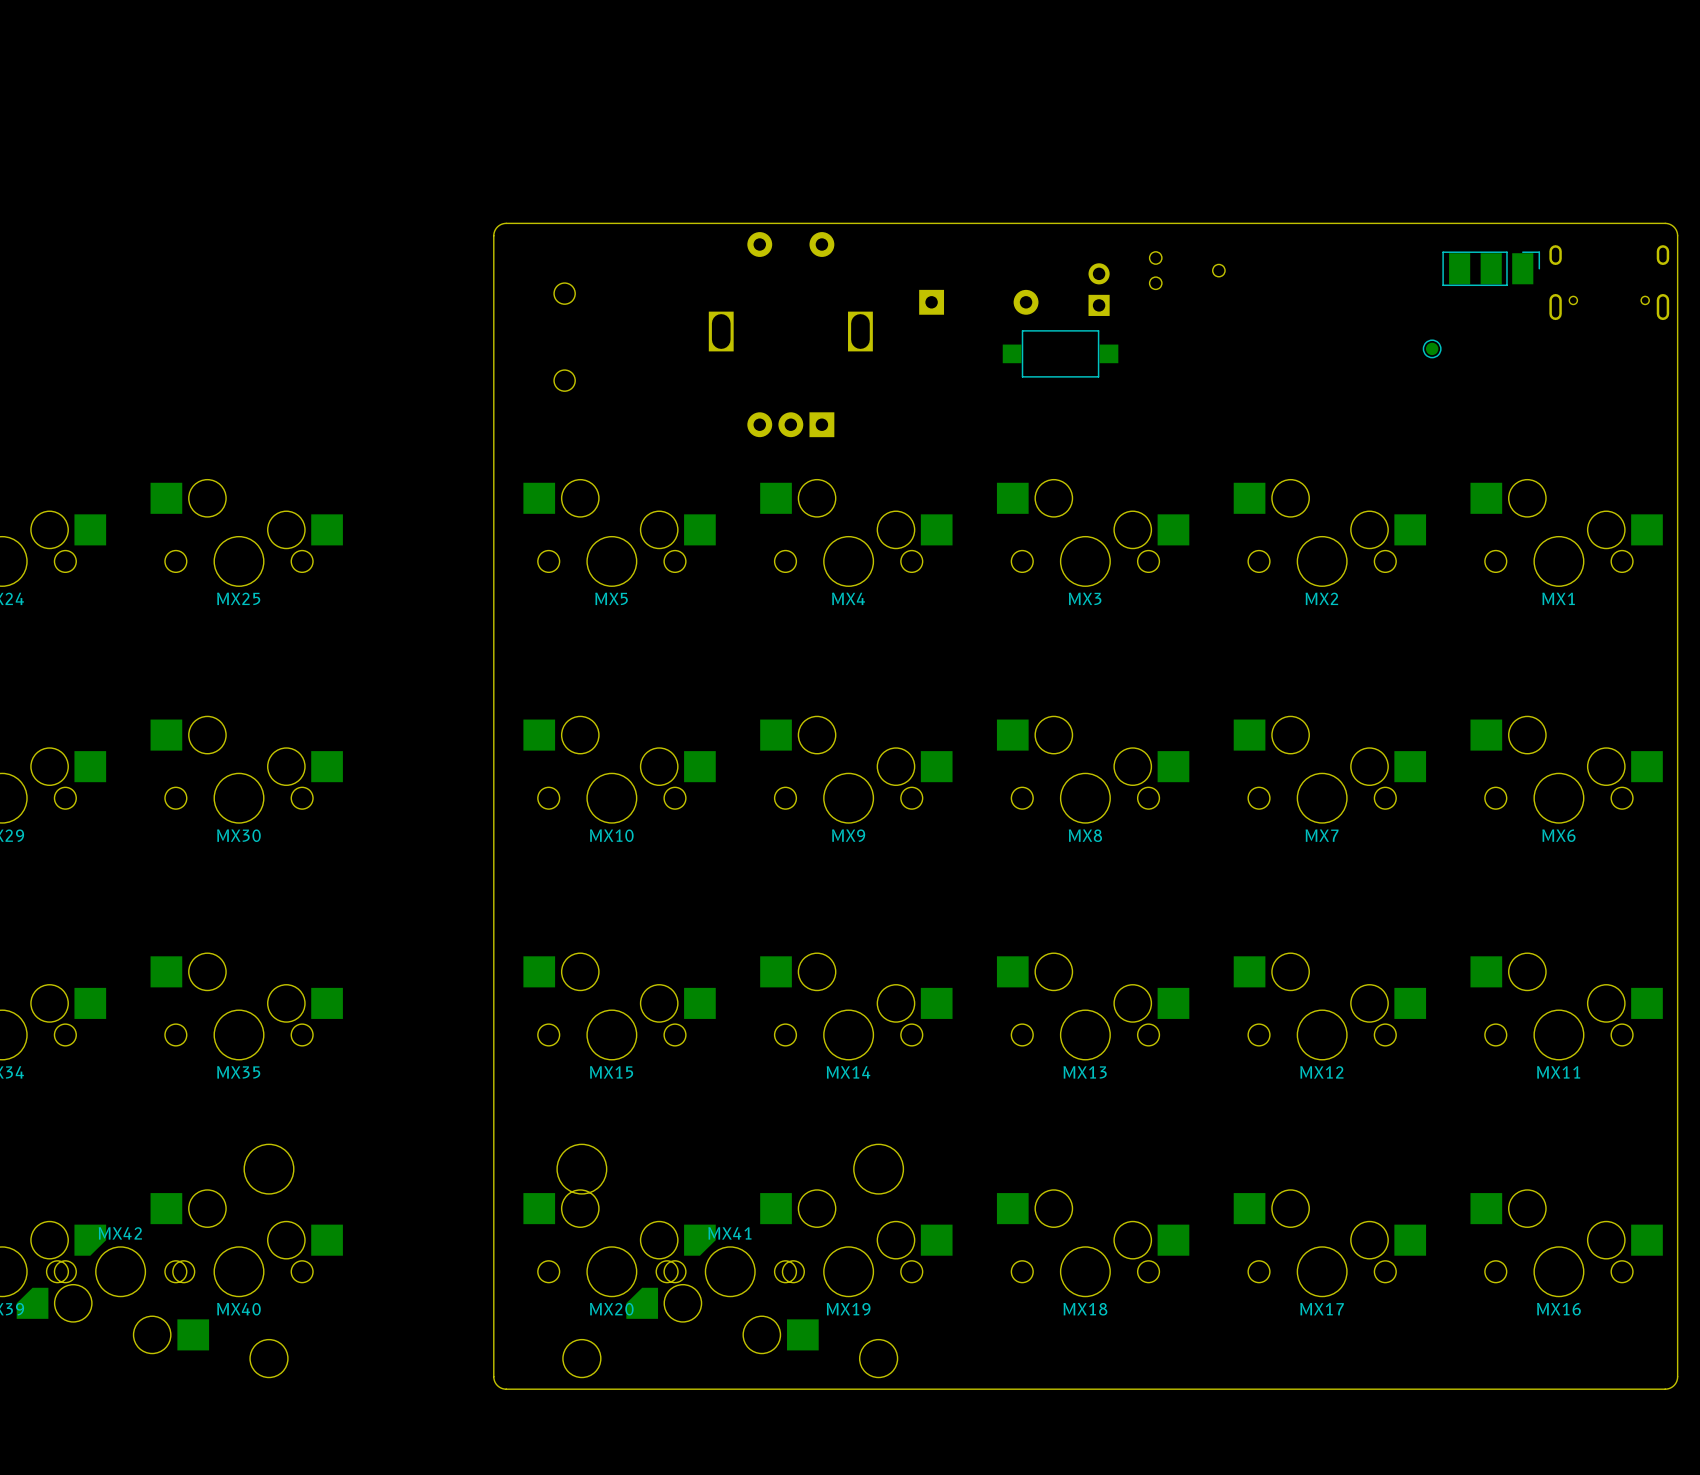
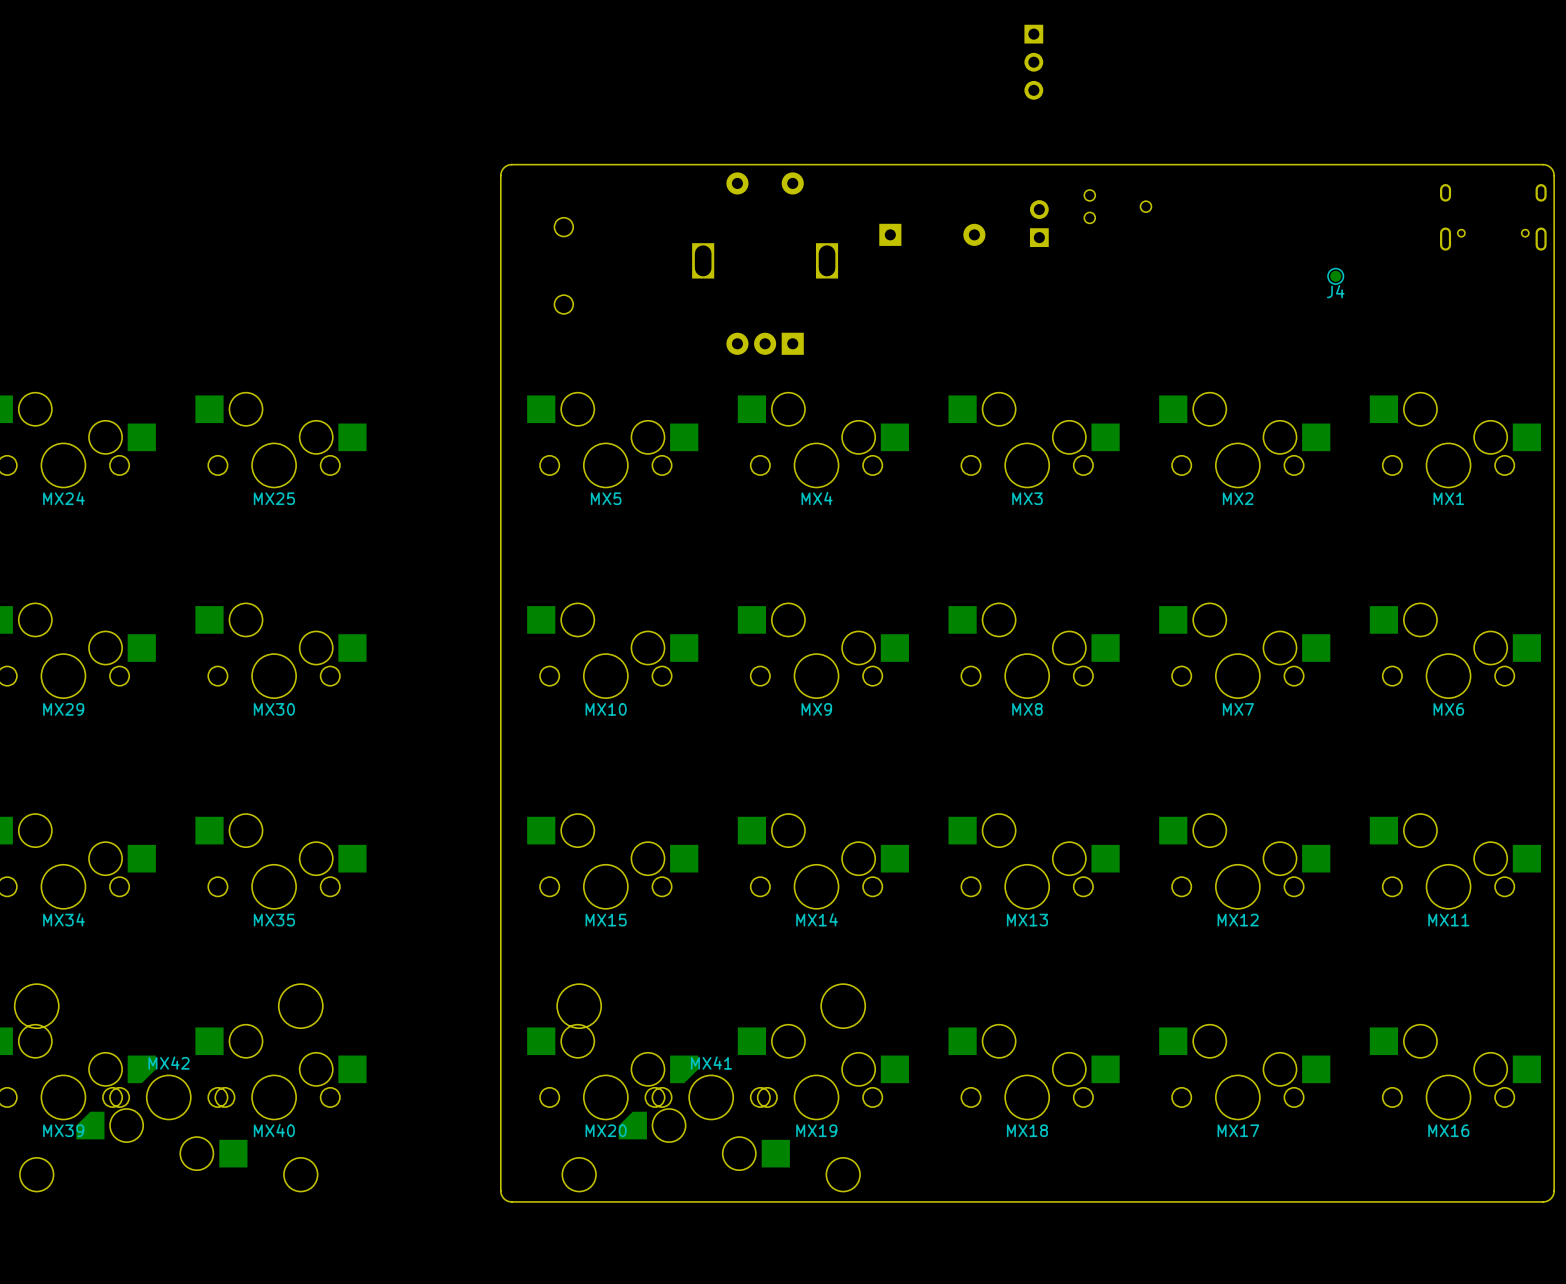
part: none -> (1033, 62)
part: (1491, 268) -> none
part: (1060, 353) -> none
J4 name: none -> J4 (1335, 291)

